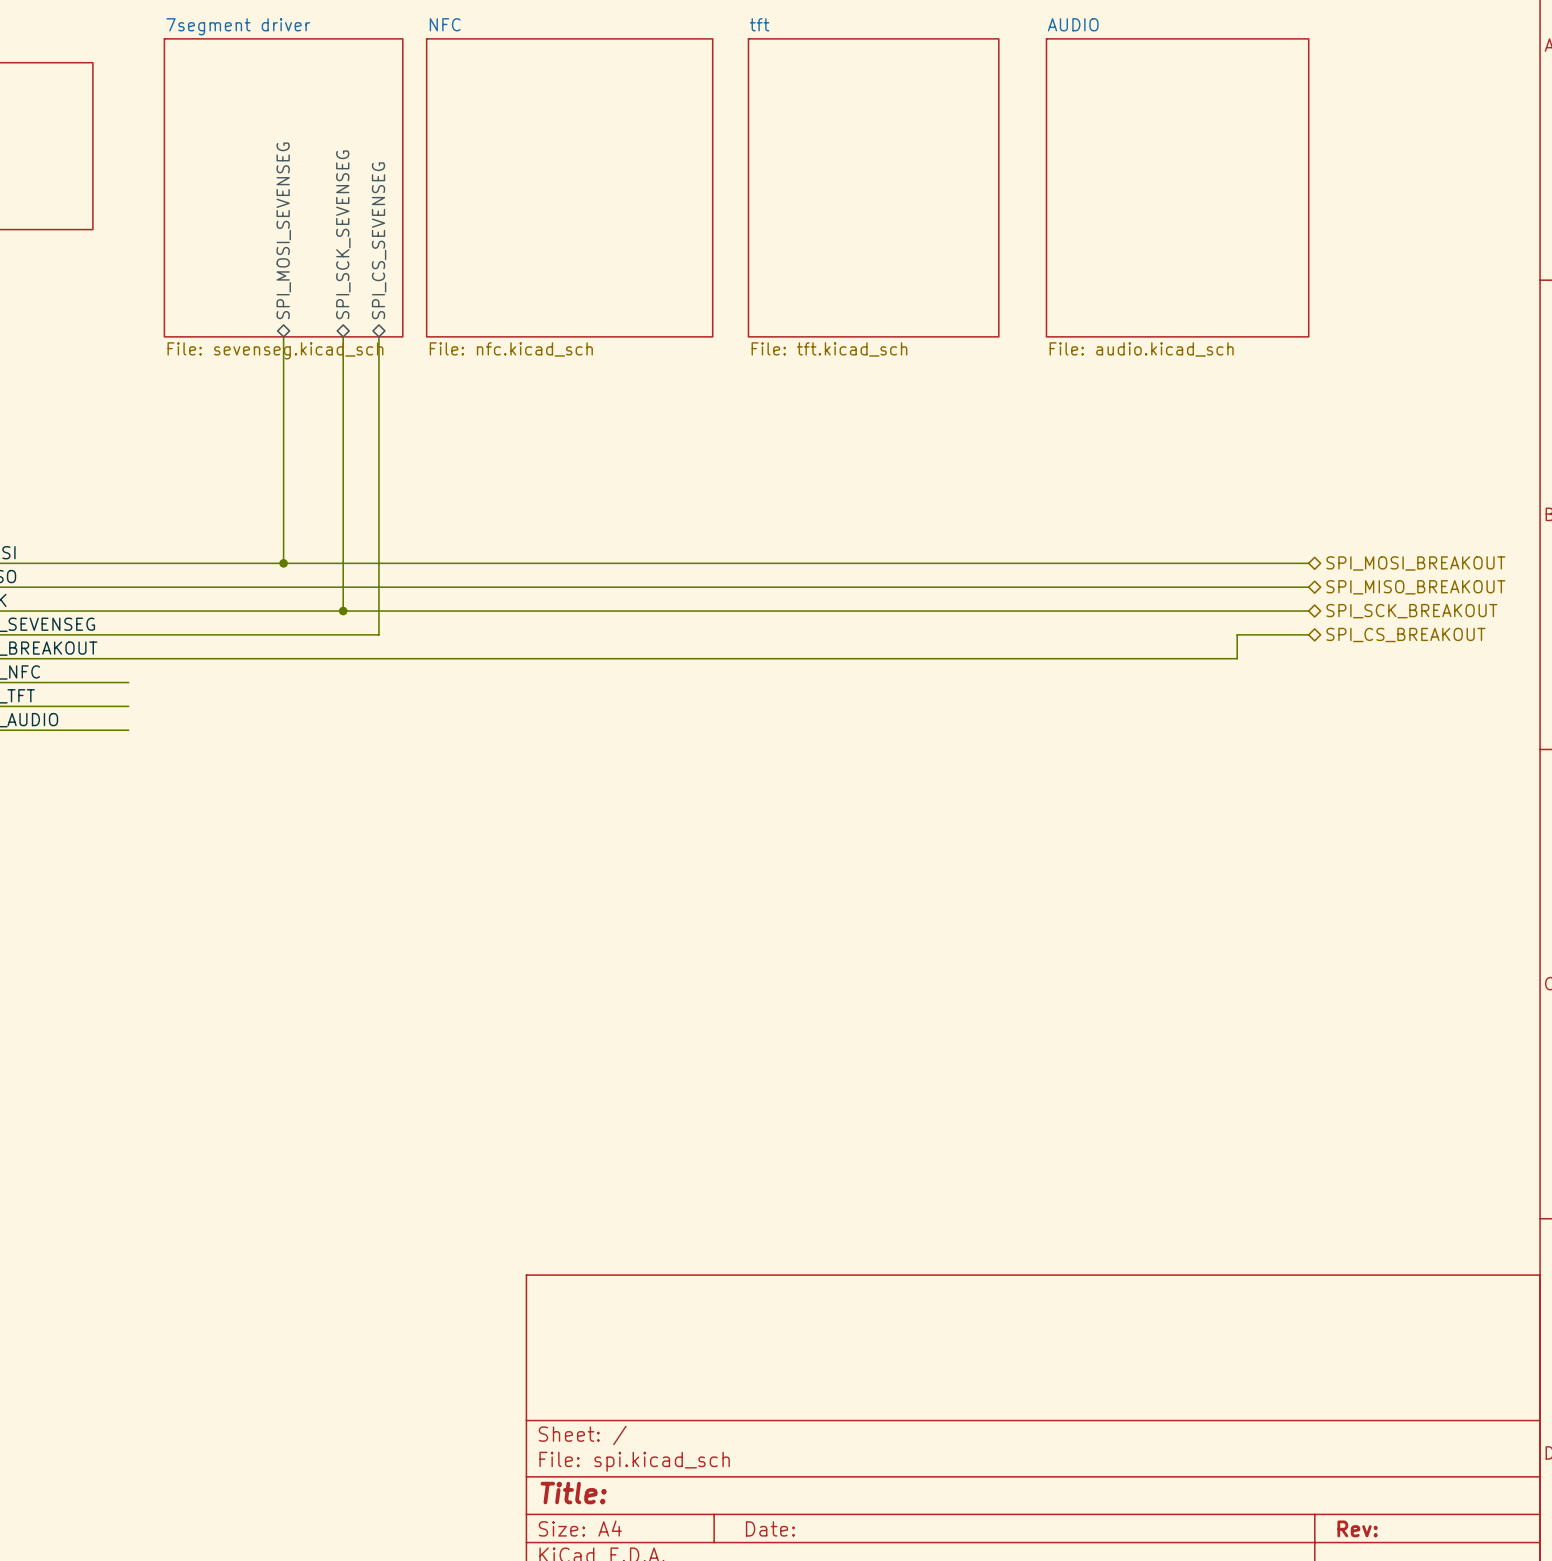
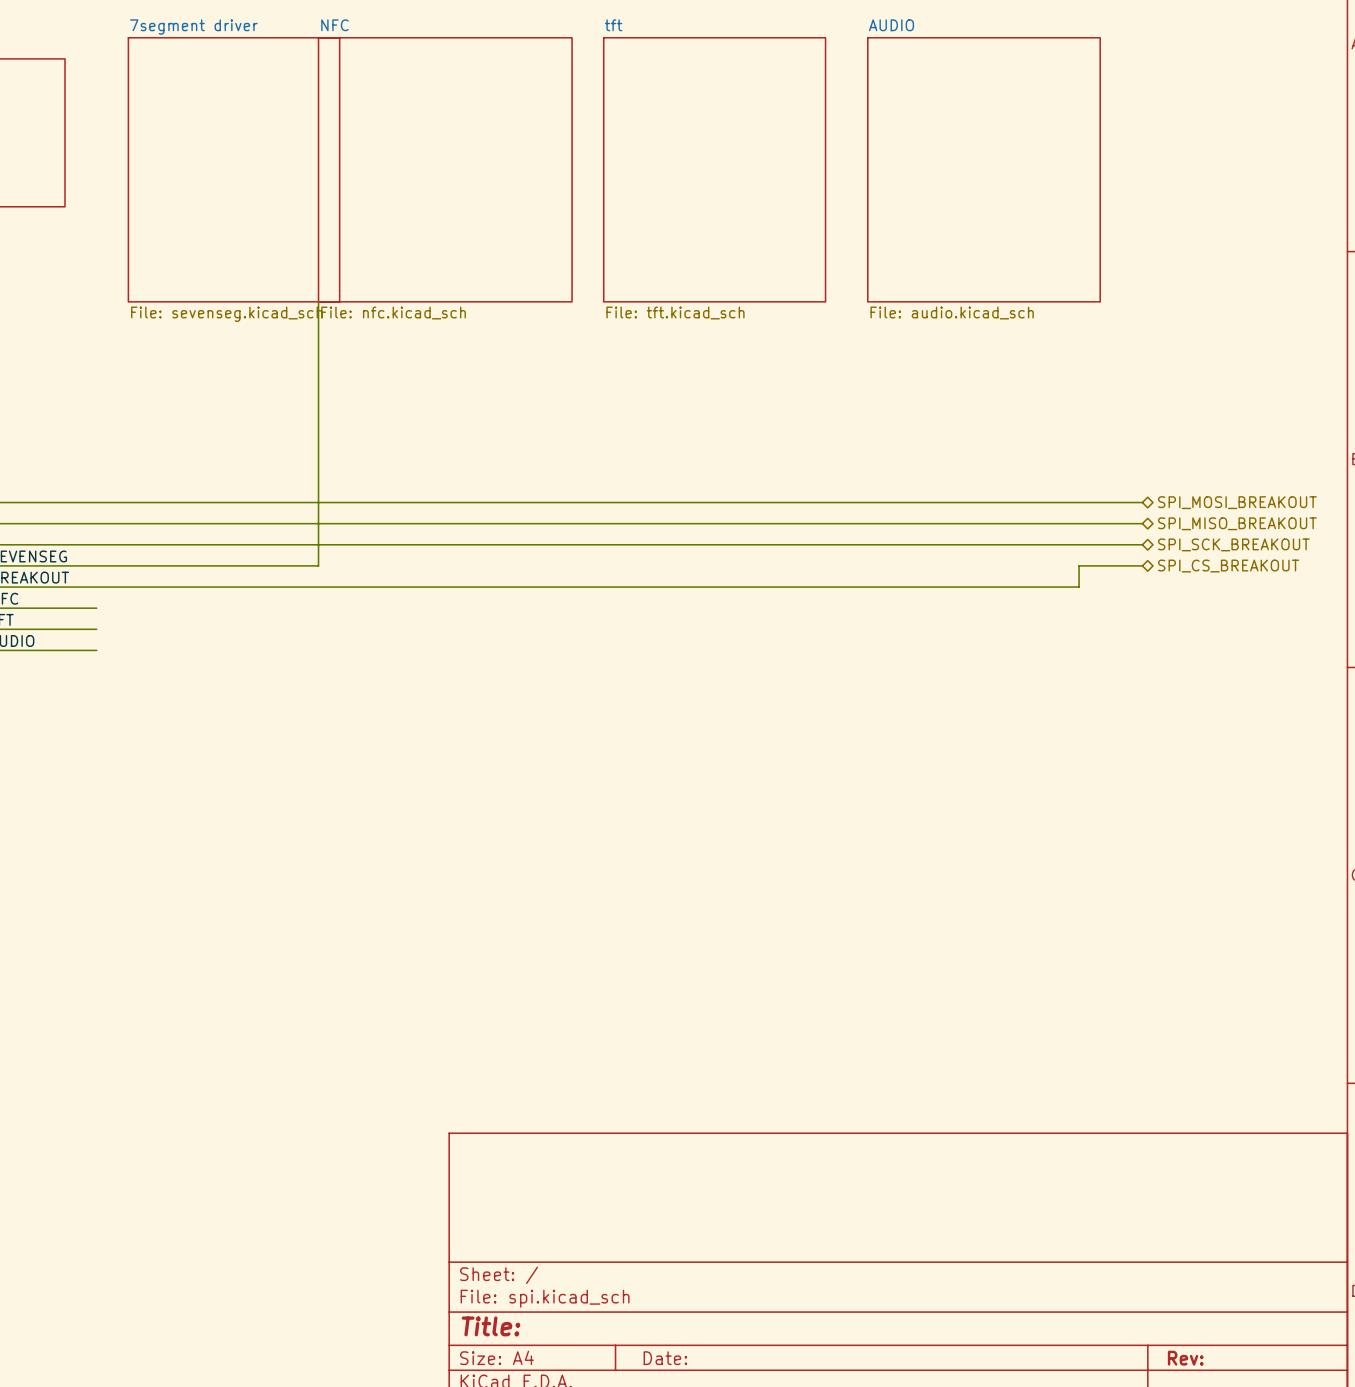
sheet NFC position: (569, 187) -> (445, 169)
sheet tft position: (873, 187) -> (714, 169)
sheet AUDIO position: (1177, 187) -> (983, 169)
sheet pin: SPI_MOSI_SEVENSEG (283, 230) -> none
sheet pin: SPI_SCK_SEVENSEG (343, 234) -> none
sheet pin: SPI_CS_SEVENSEG (379, 240) -> none
wire: (283, 336) (283, 563) -> none
wire: (343, 336) (343, 611) -> none
junction: (283, 563) -> none
junction: (343, 611) -> none

